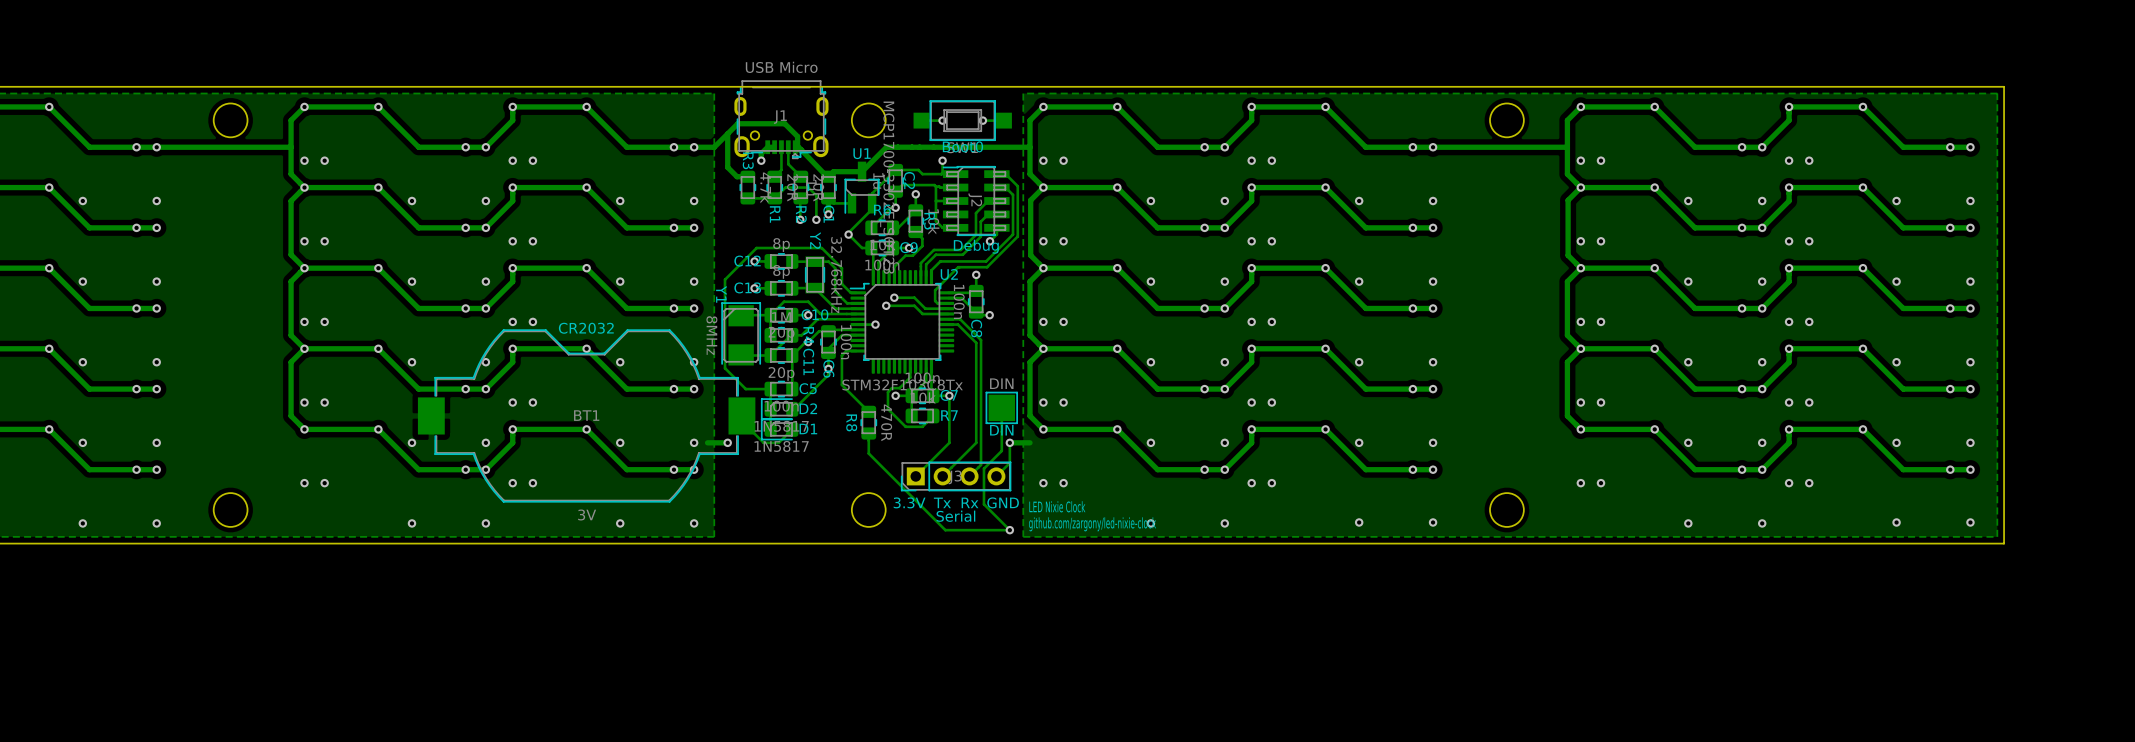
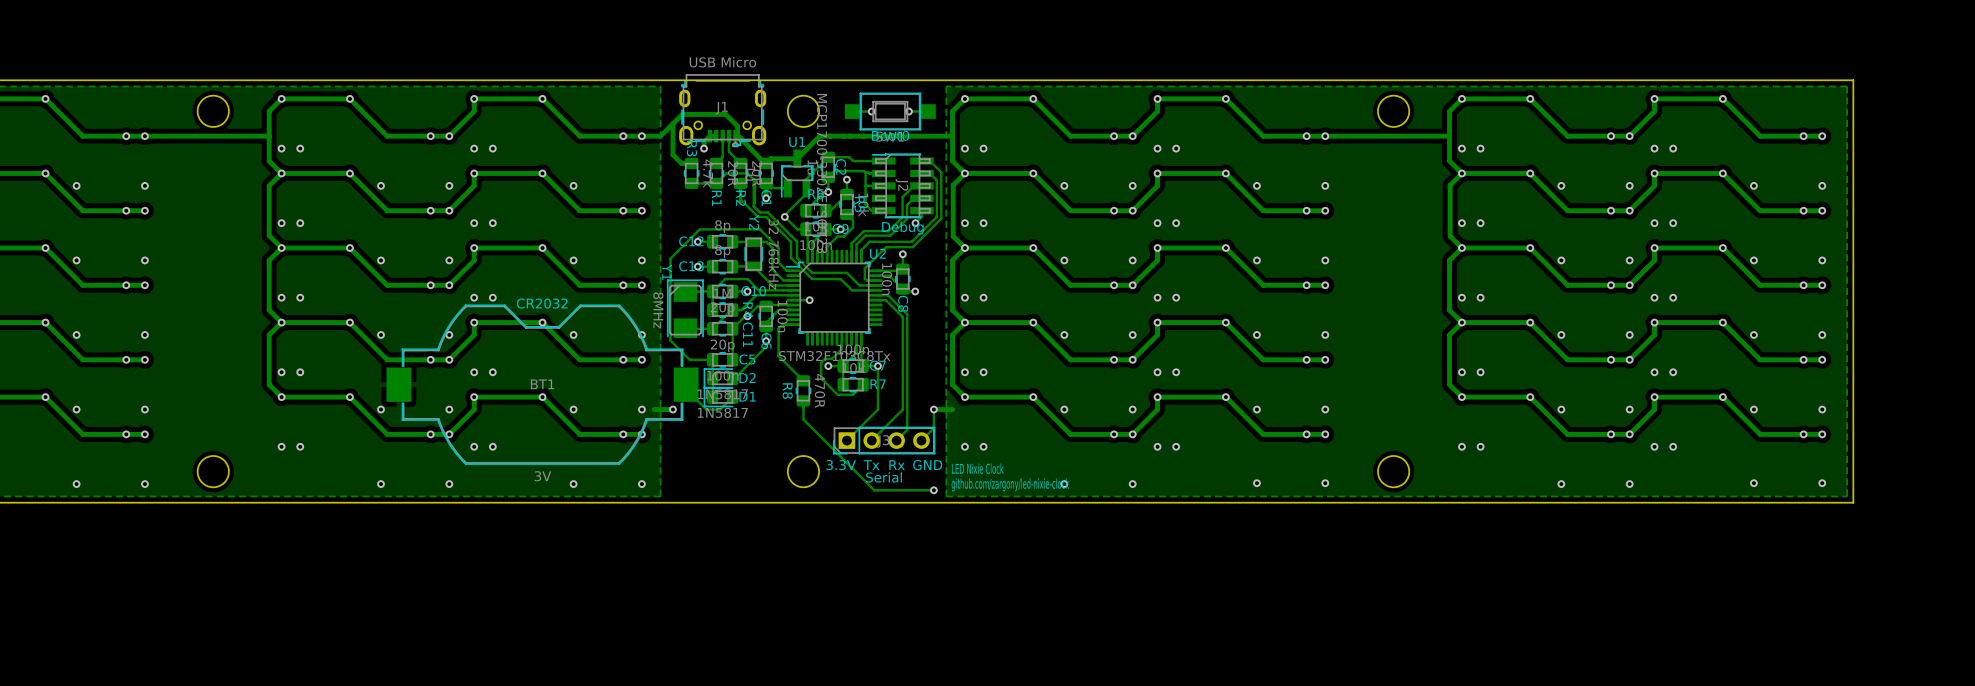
track: (942, 160) (941, 174) -> none
via: (942, 160) -> none
via: (800, 219) -> none
via: (816, 219) -> none
track: (894, 297) (914, 297) (925, 308) (929, 308) -> (753, 179) (753, 206) (759, 212) (767, 212) (797, 241) (797, 257) (812, 272) (846, 272) (859, 285)
via: (894, 297) -> none
track: (886, 305) (914, 305) (922, 313) -> (740, 183) (740, 199) (758, 216) (766, 216) (791, 241) (791, 257) (812, 279) (840, 279) (853, 290)
via: (886, 305) -> none
track: (1001, 407) (1001, 450) (983, 468) (983, 504) (1009, 530) -> none
DIN: DIN (1001, 407) -> none

